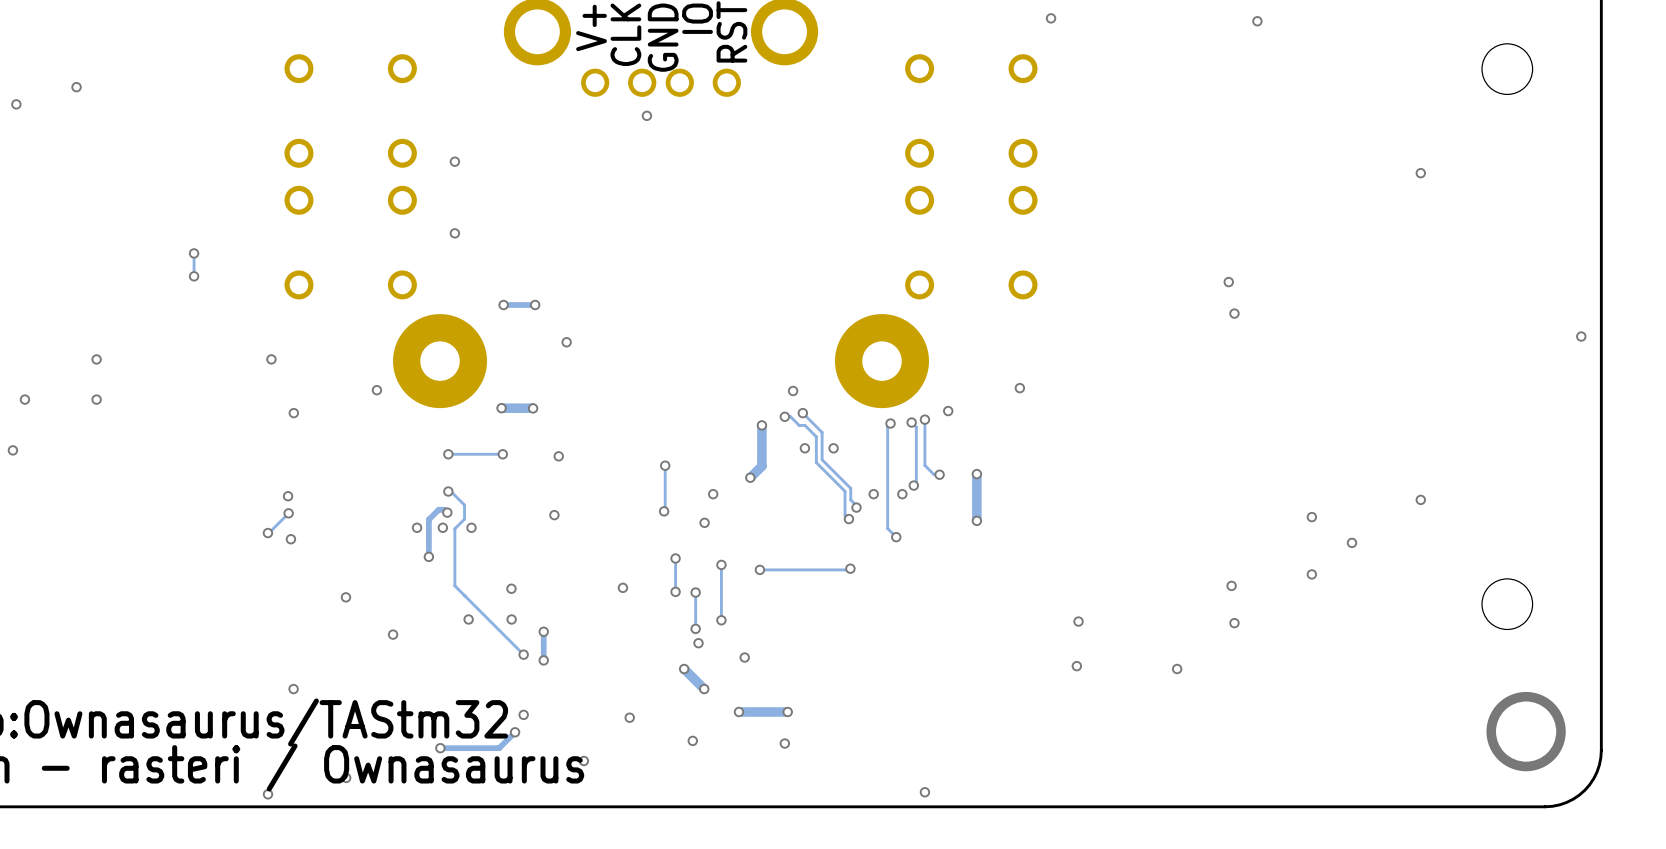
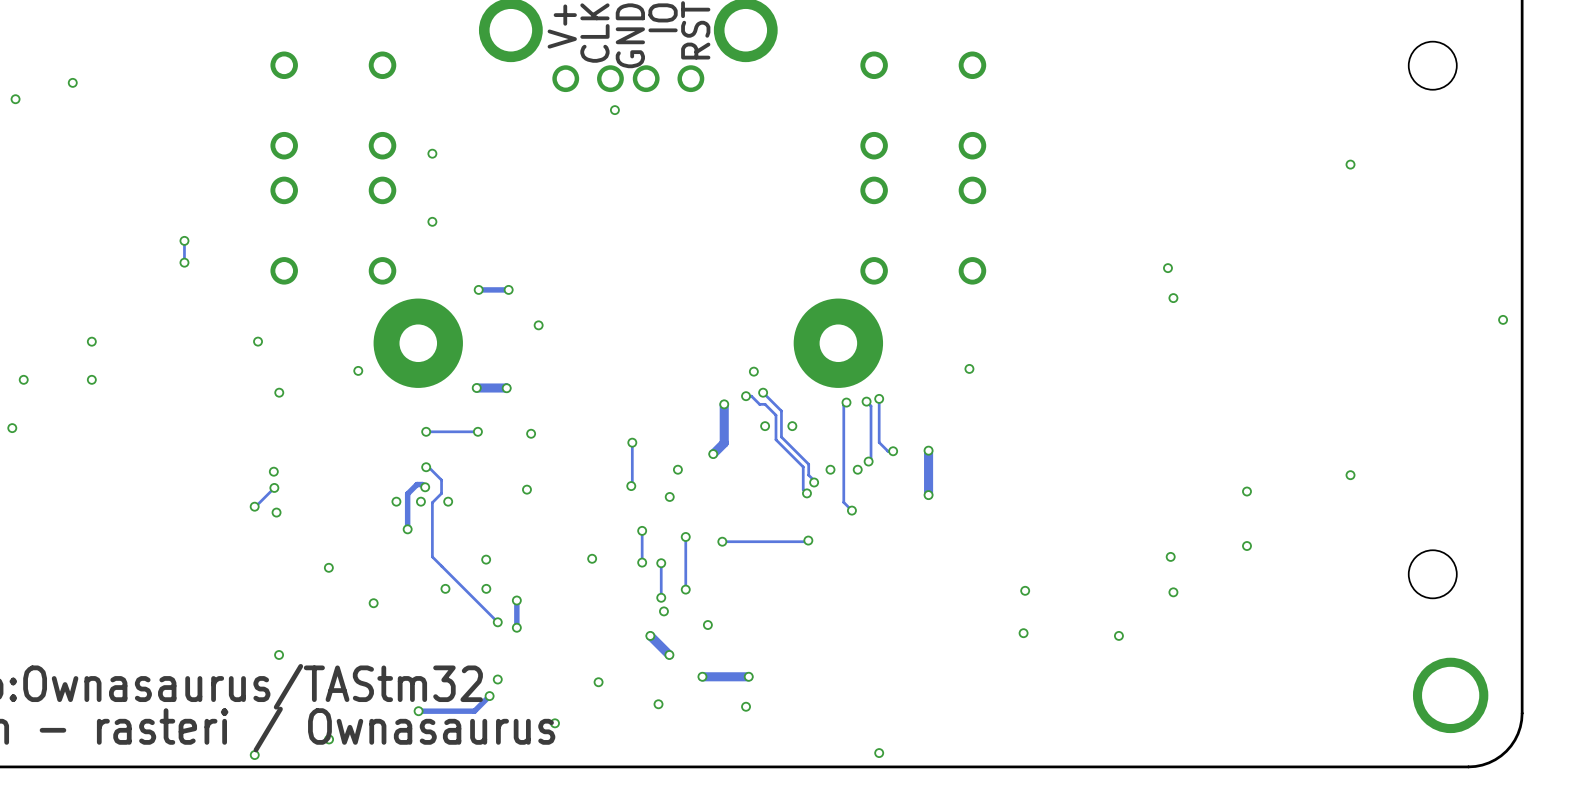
via: (1051, 18) -> none
via: (1257, 21) -> none
via: (948, 411) -> none
via: (1351, 542) -> none

